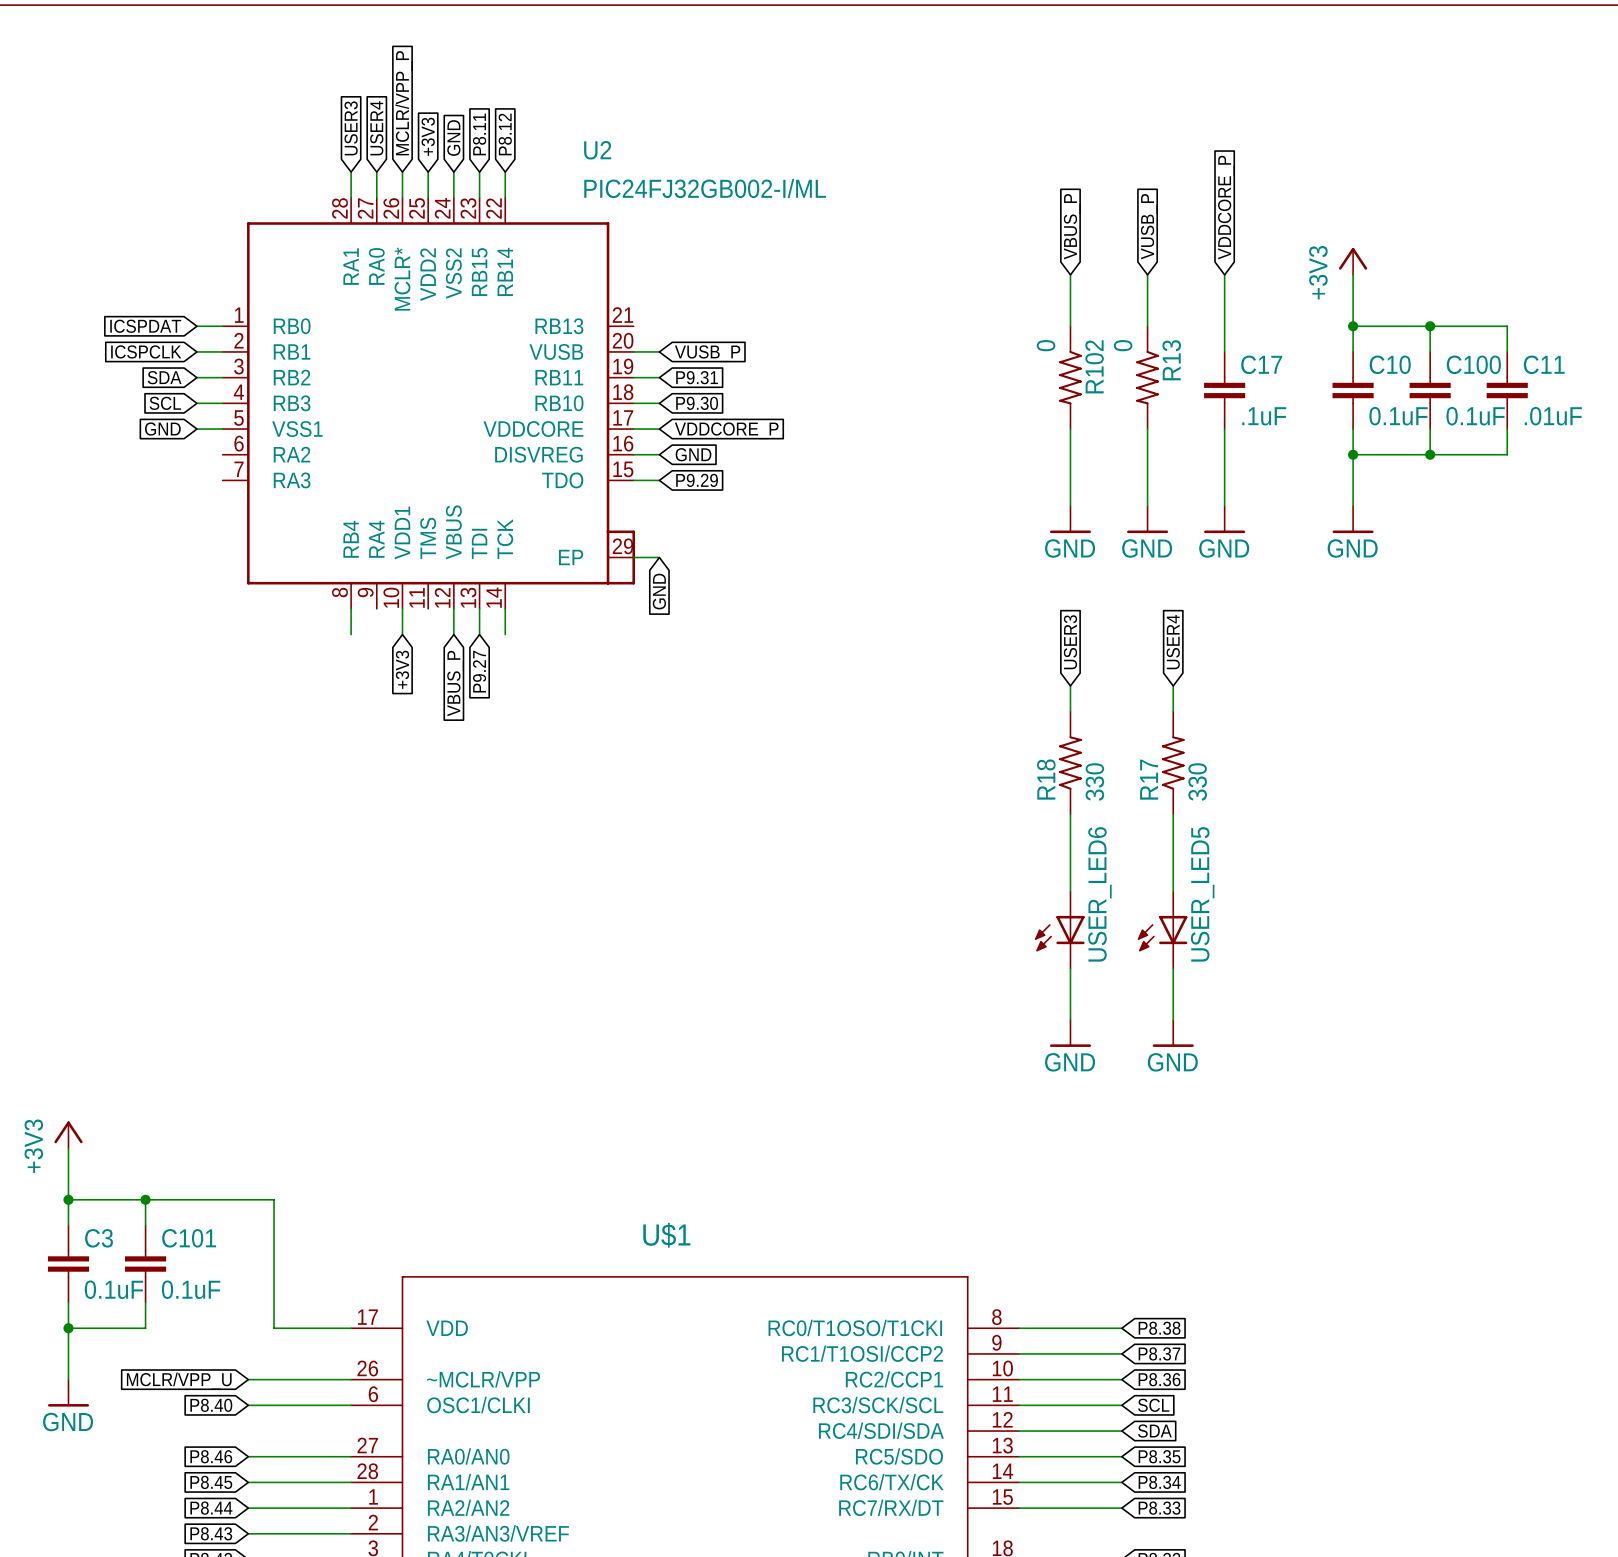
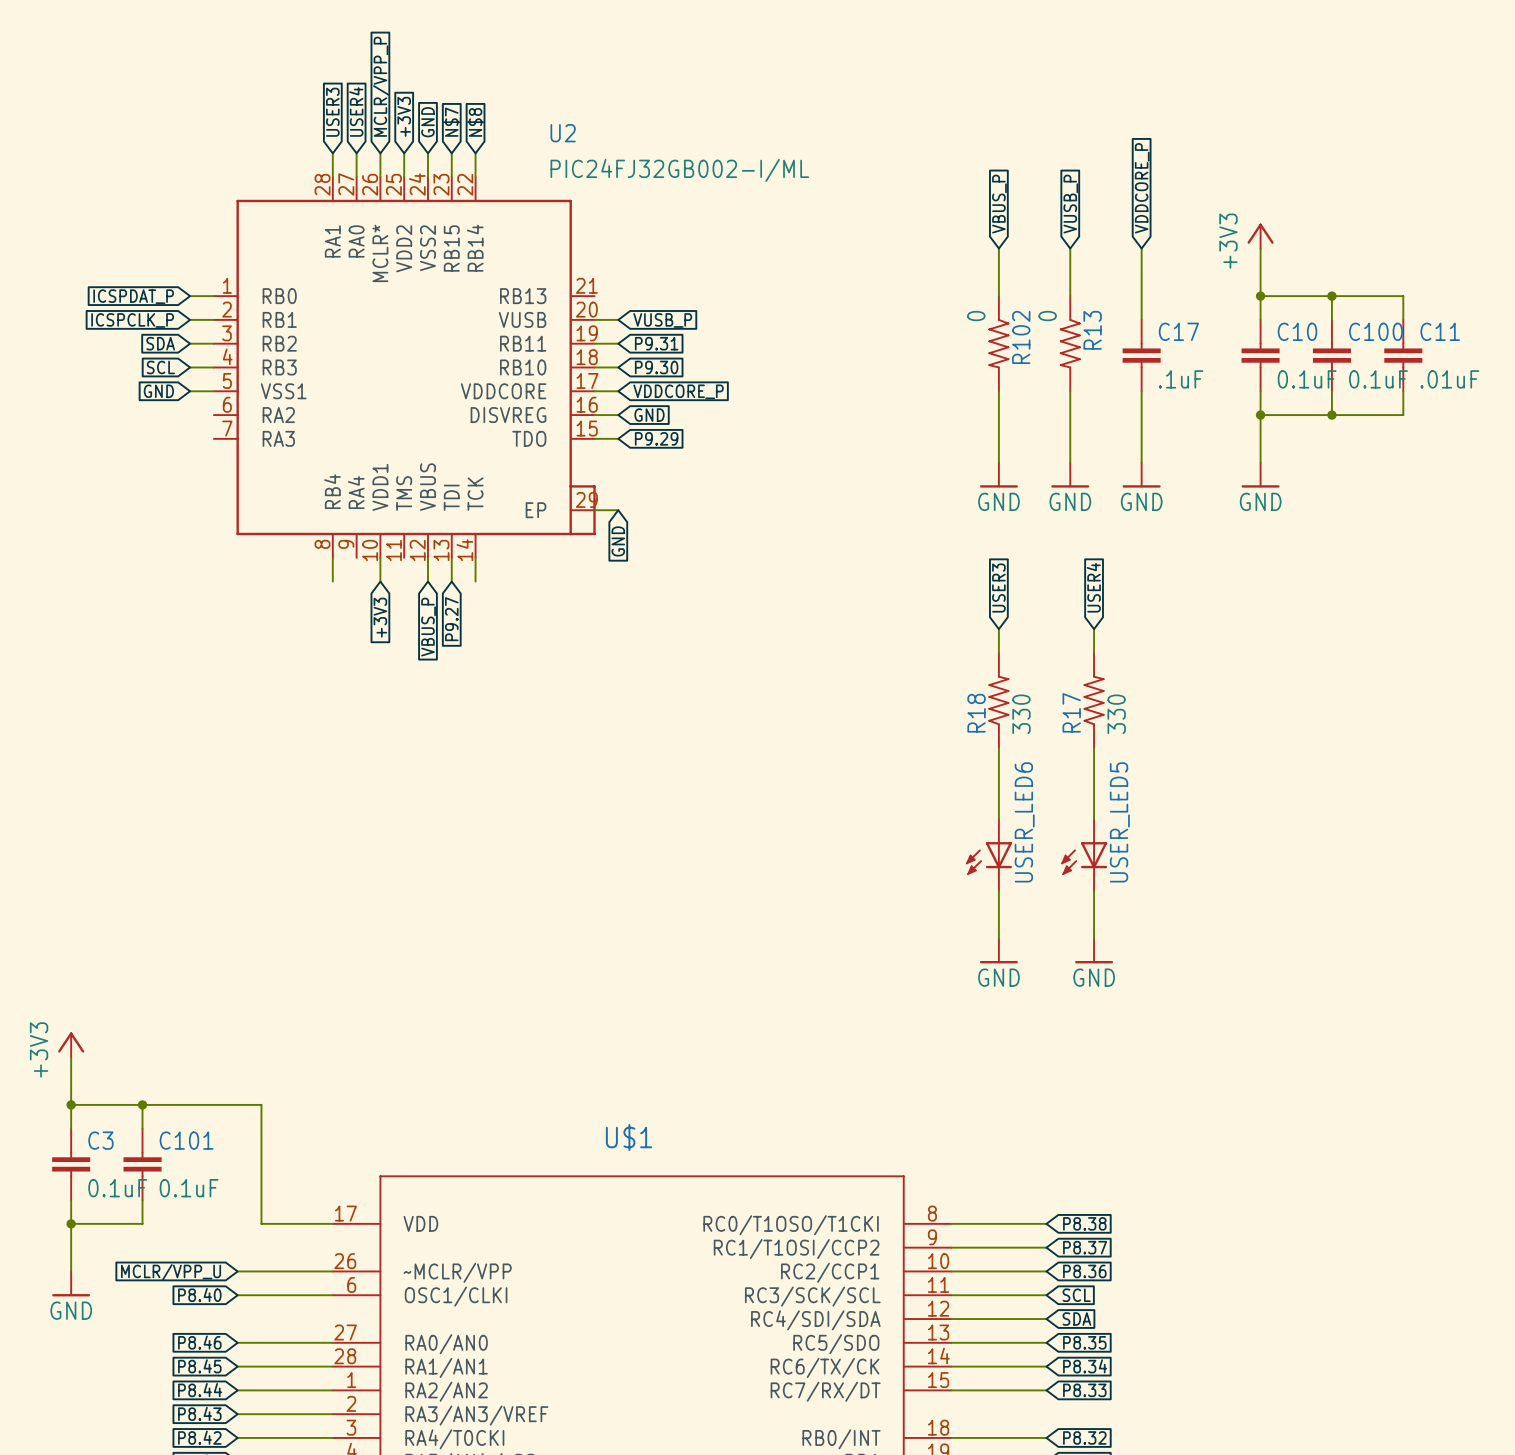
global label: P8.11 (479, 134) -> N$7 (451, 122)
global label: P8.12 (505, 134) -> N$8 (475, 122)
global label: ICSPDAT (145, 326) -> ICSPDAT_P (133, 296)
global label: ICSPCLK (146, 351) -> ICSPCLK_P (132, 320)

